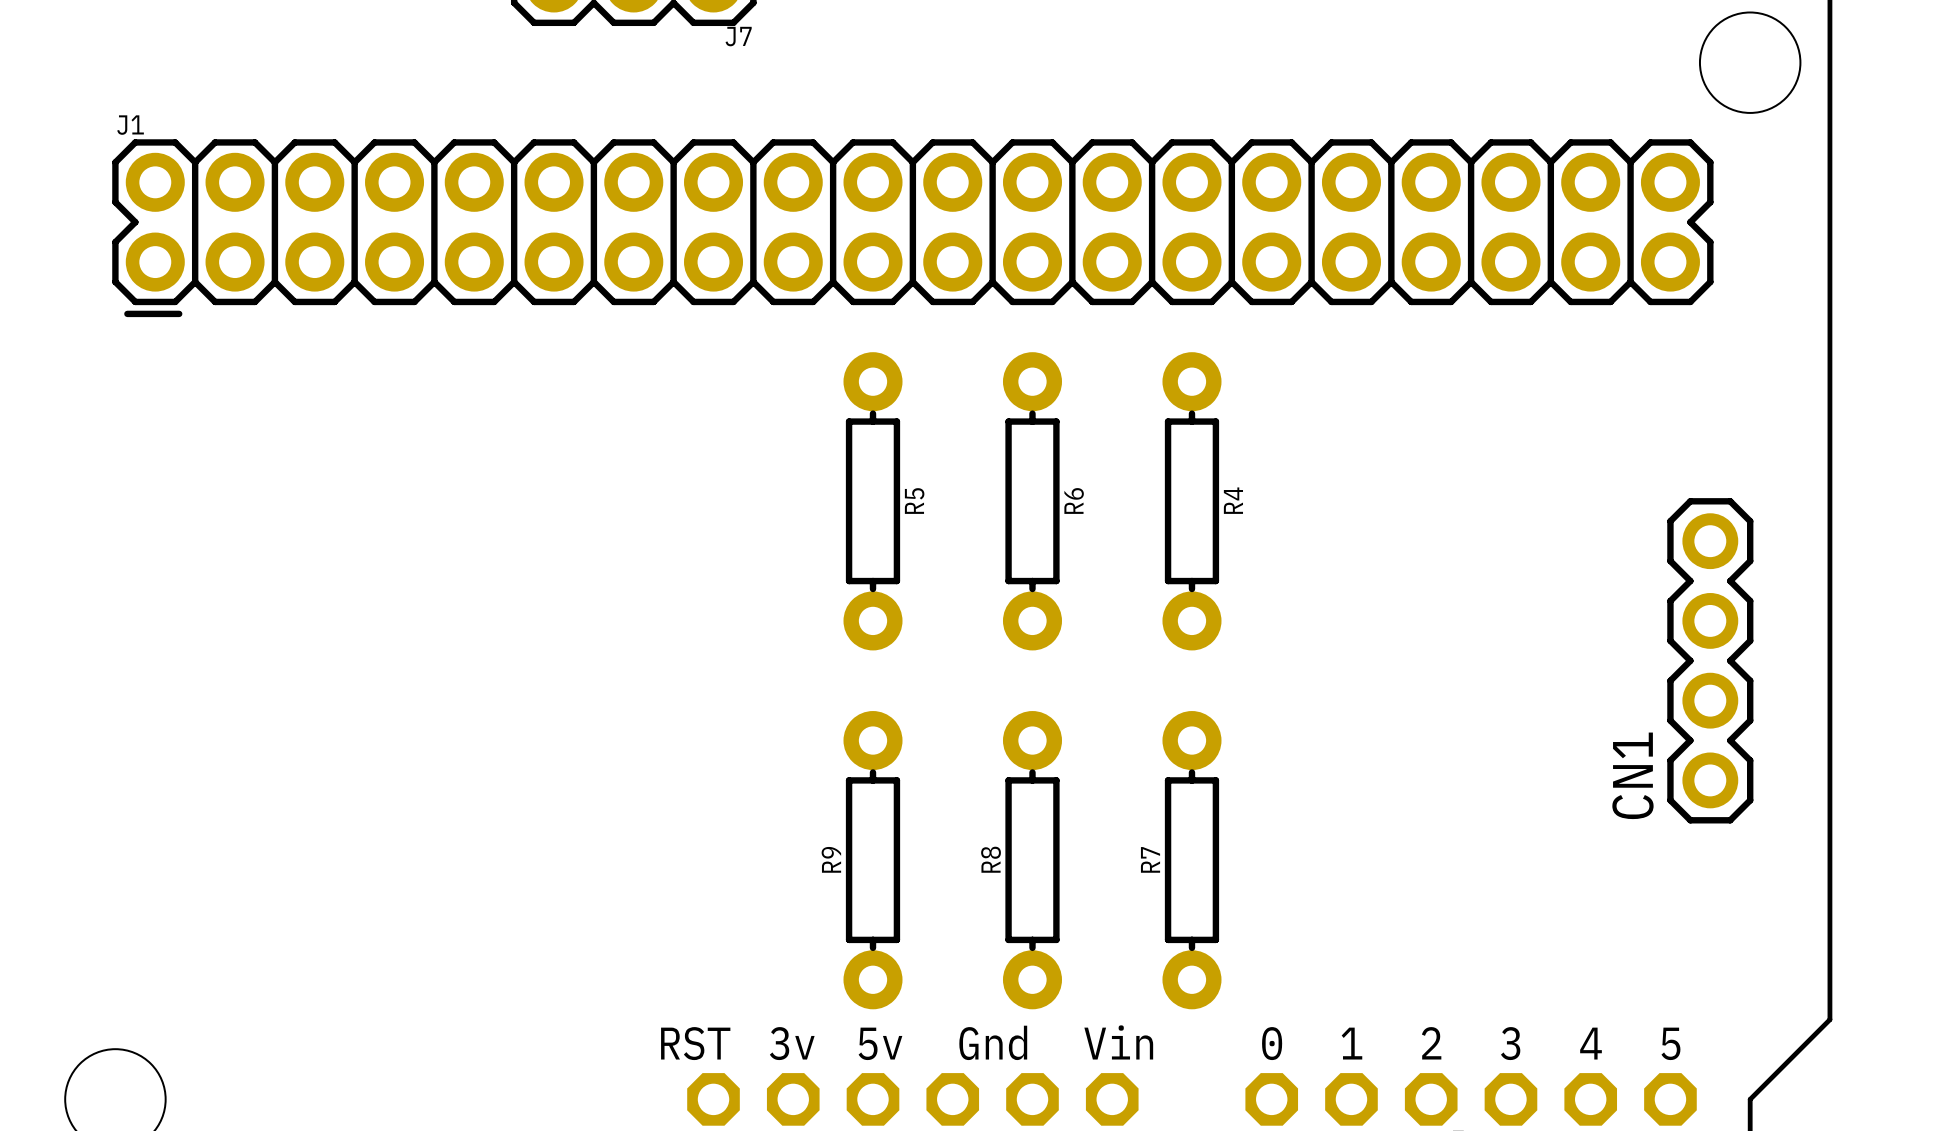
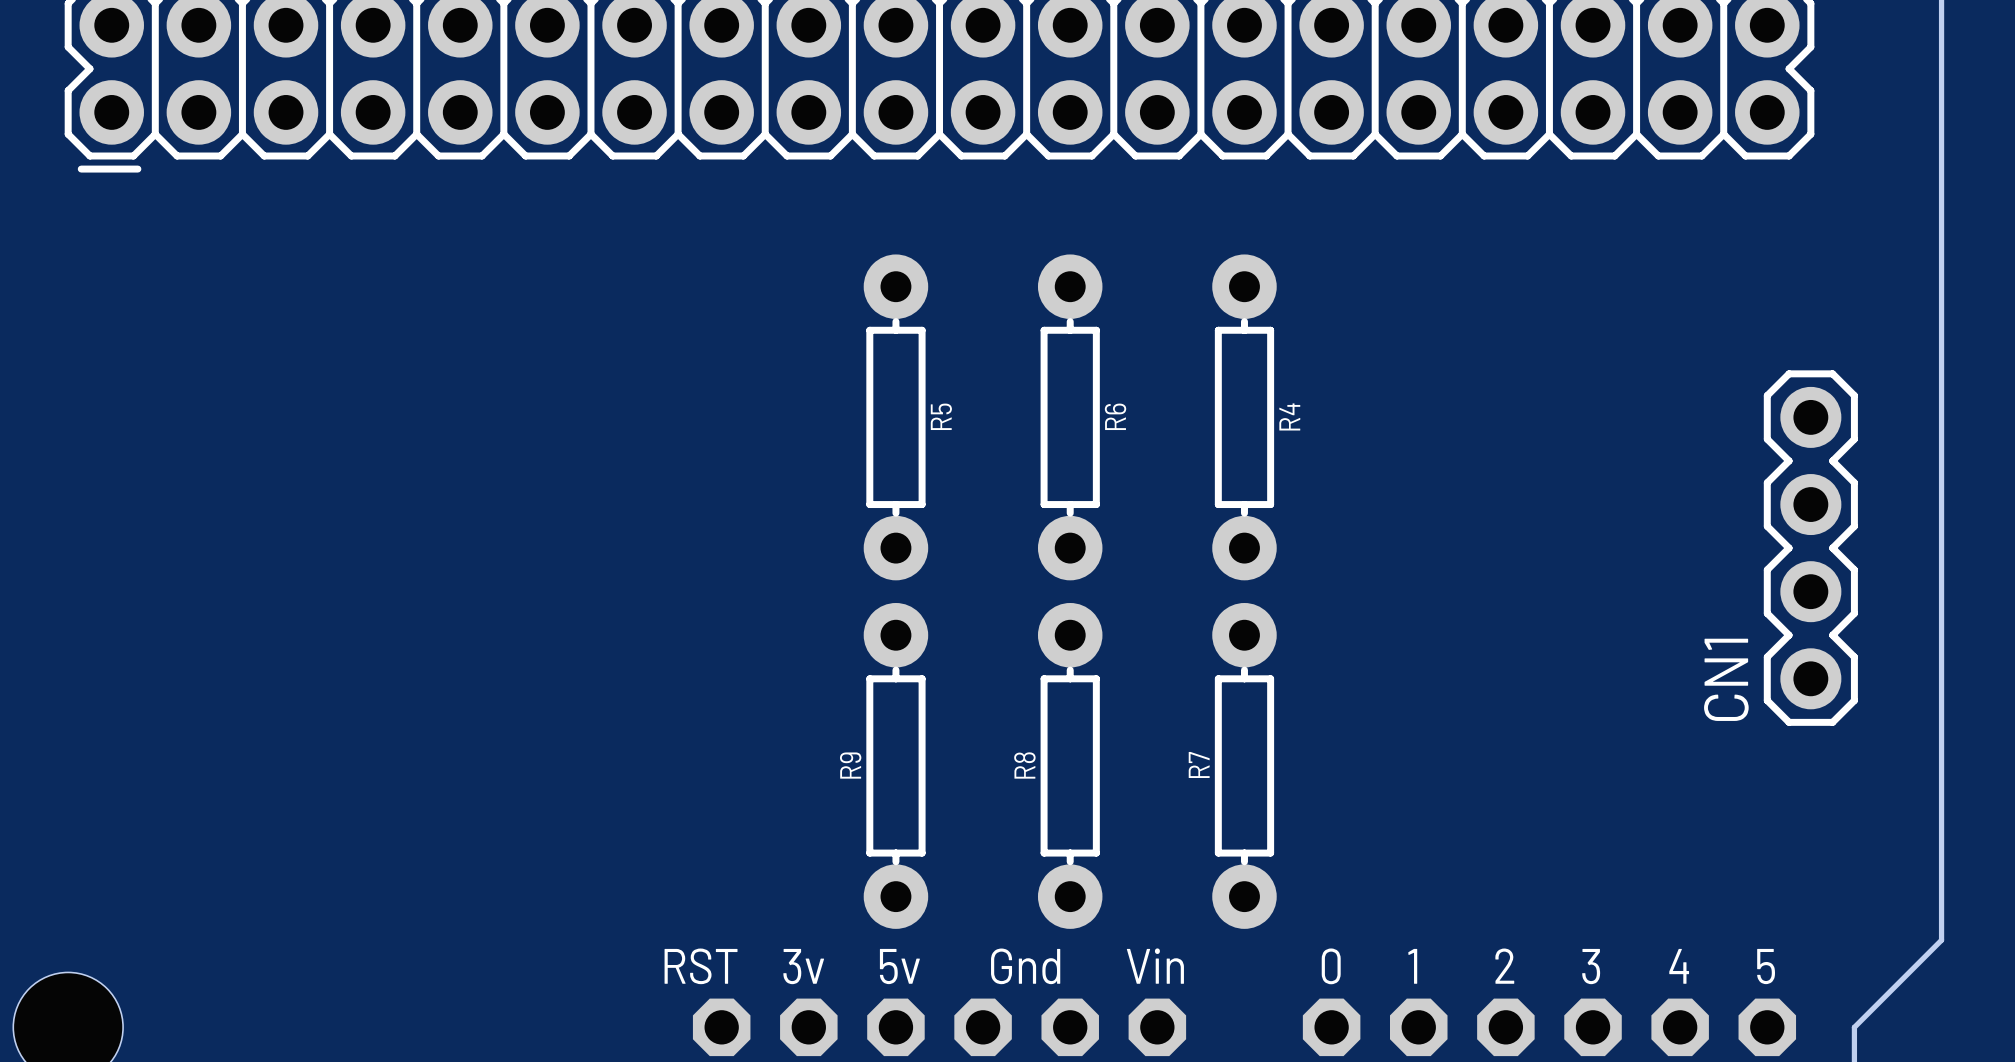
R5 position: (873, 501) -> (895, 417)
R6 position: (1032, 501) -> (1070, 417)
R4 position: (1191, 501) -> (1244, 417)

